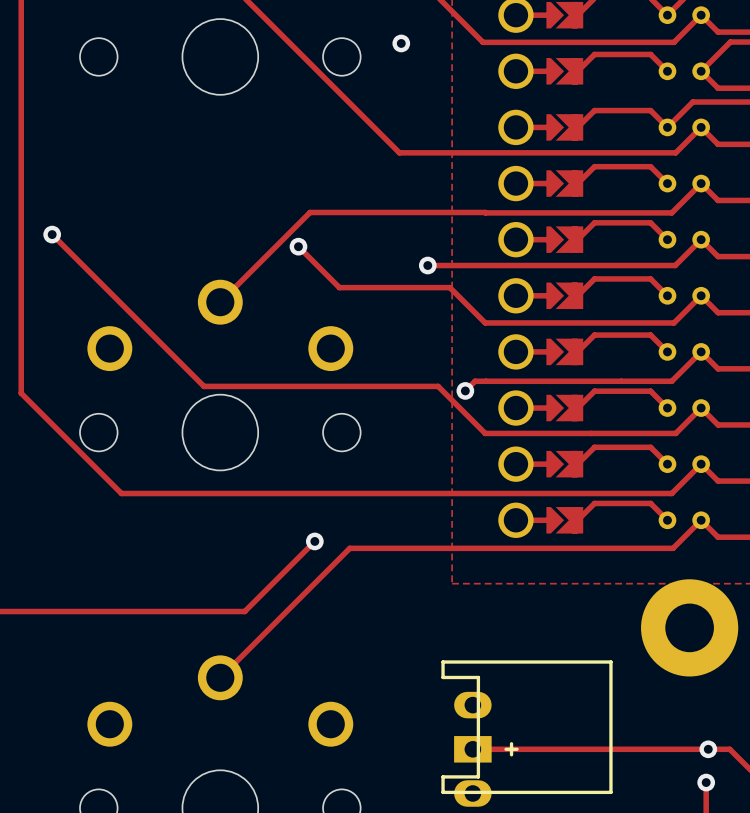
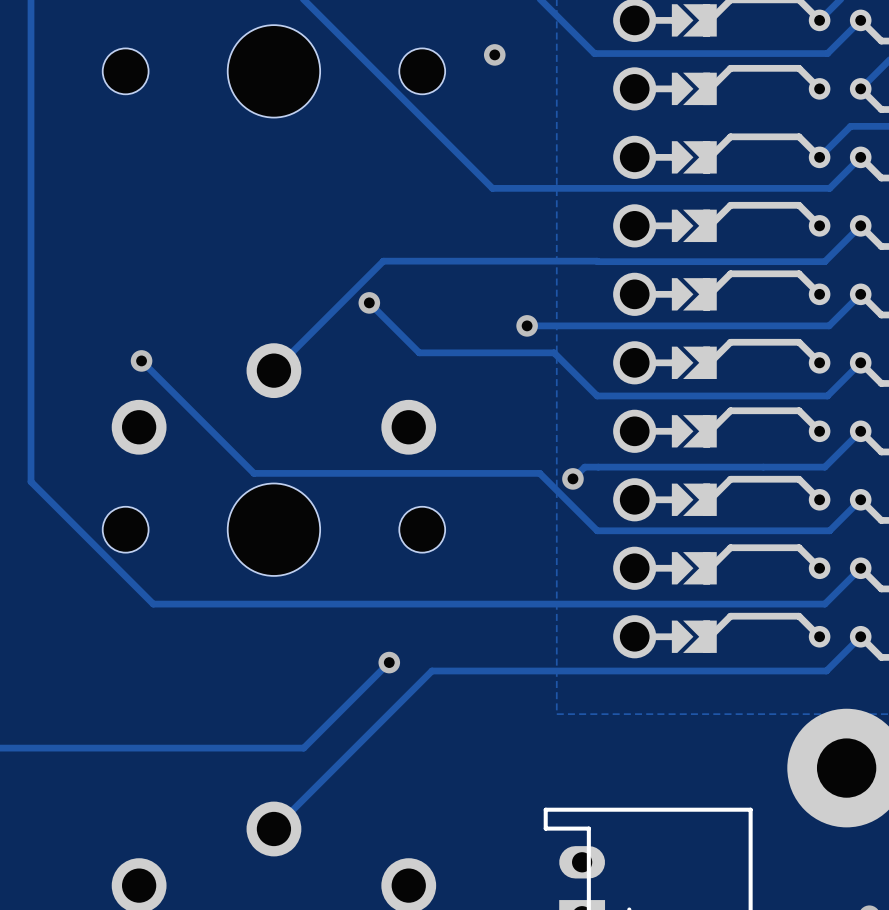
track: (52, 234) (111, 294) -> none
via position: (52, 234) -> (141, 360)

